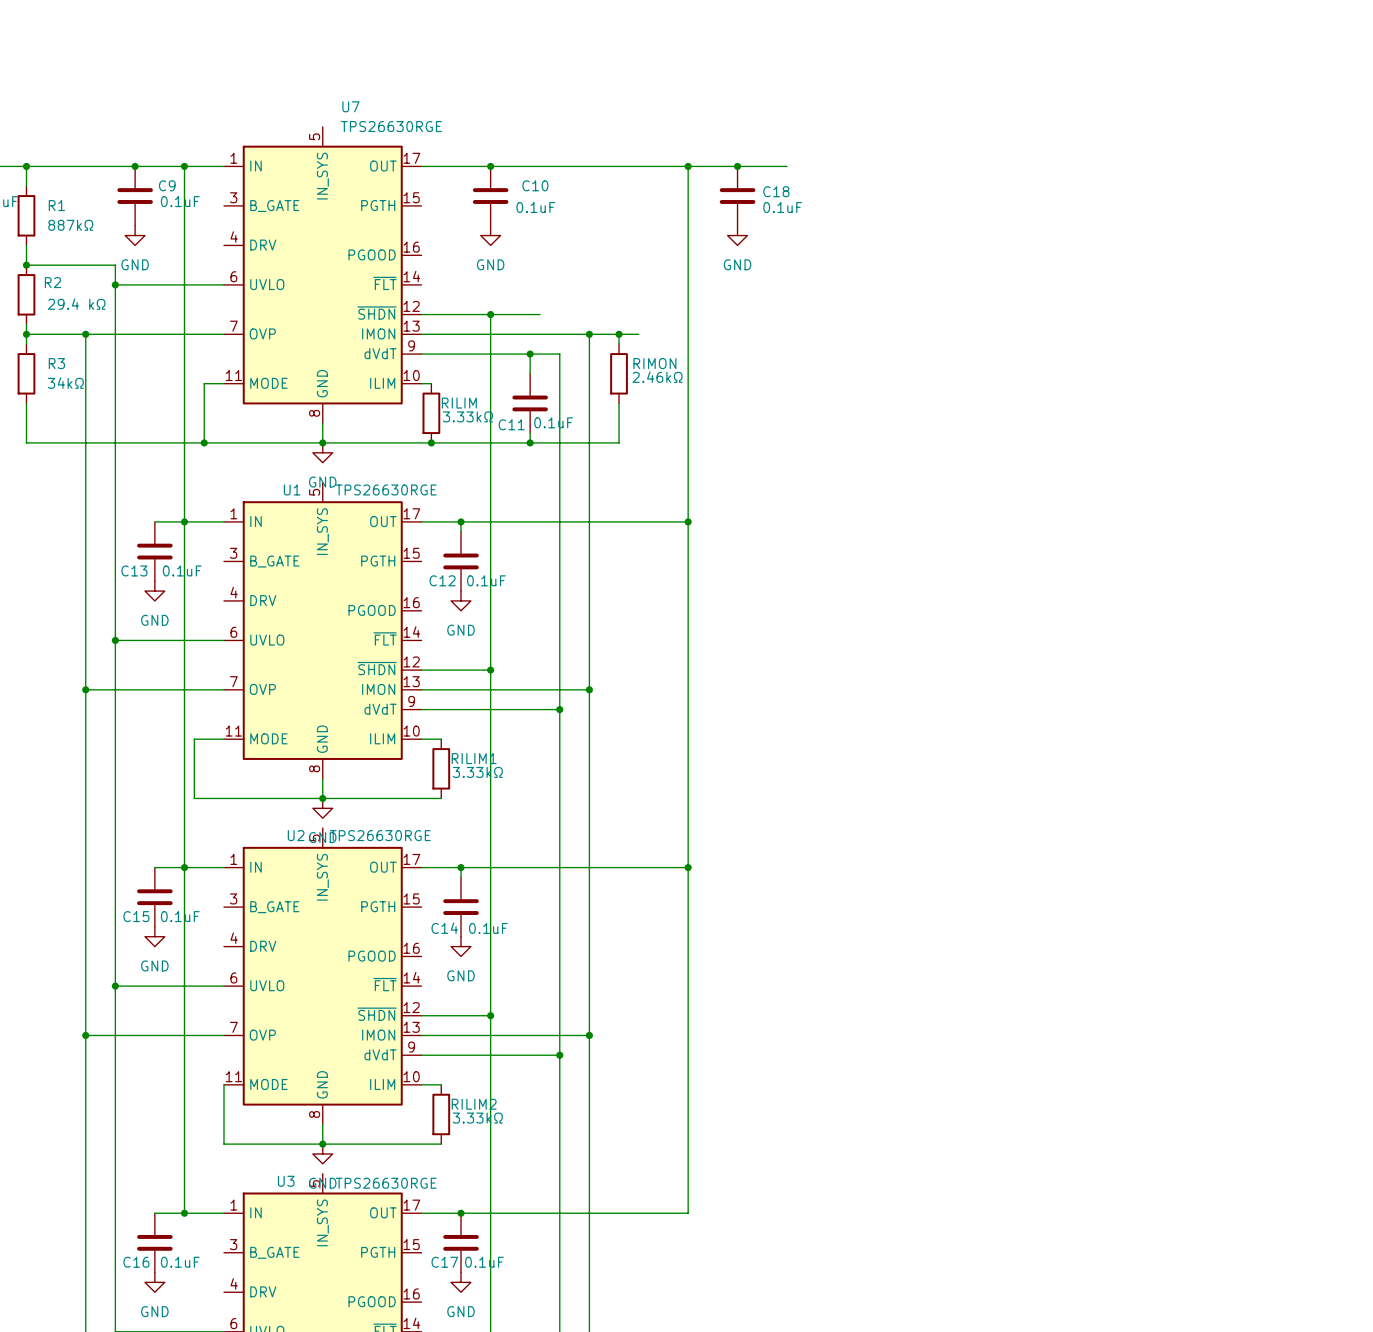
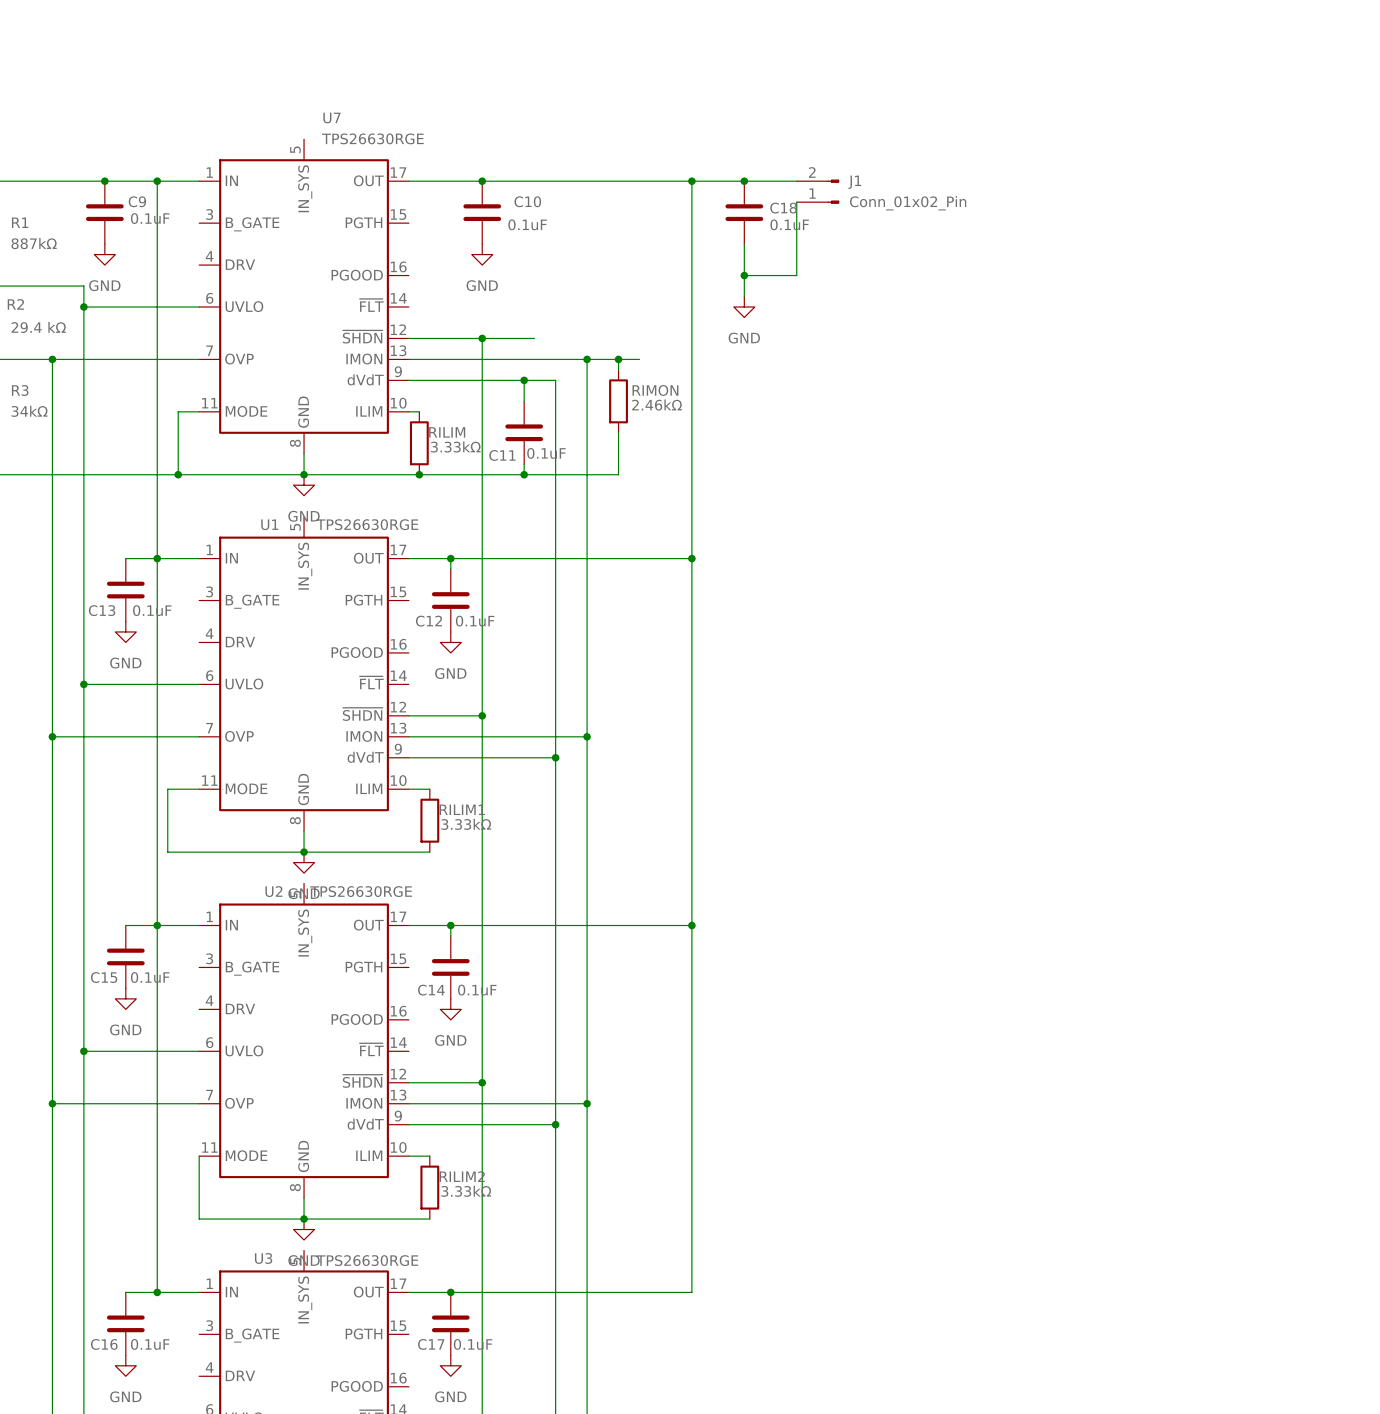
J1: none -> Conn_01x02_Pin (818, 191)
wire: none -> (796, 202) (796, 275) (744, 275)
wire: none -> (744, 244) (744, 296)
power symbol position: GND (737, 235) -> GND (744, 307)
junction: none -> (744, 275)

